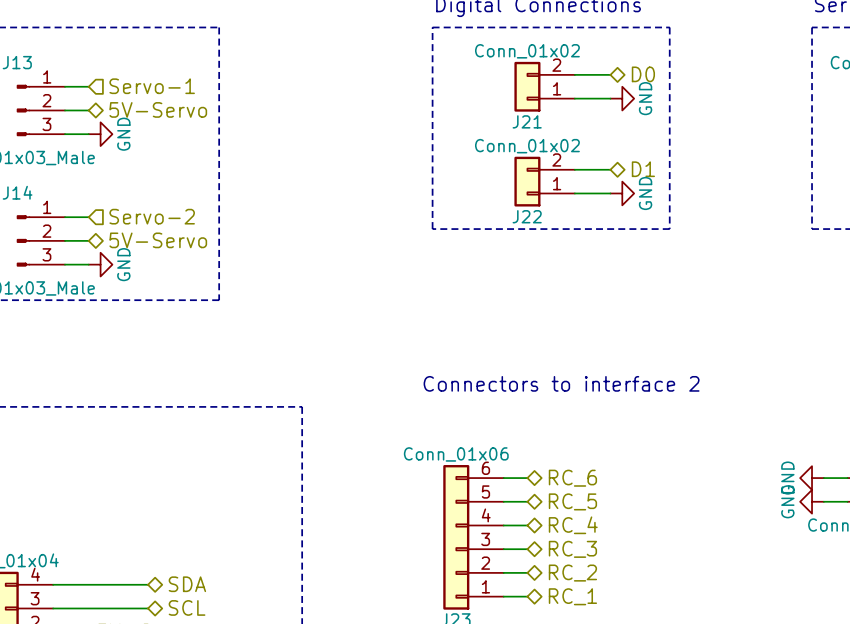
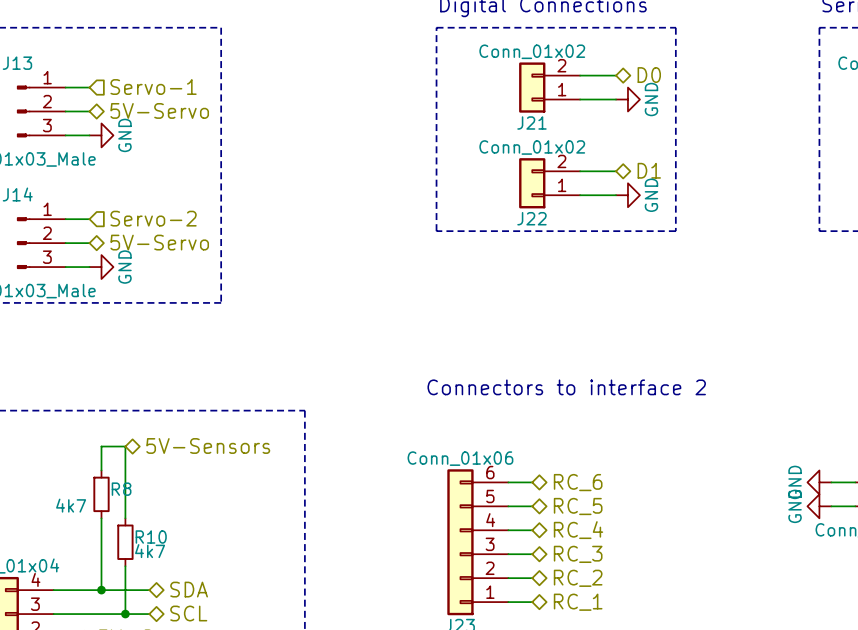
hierarchical label: none -> 5V-Sensors (208, 445)
wire: none -> (101, 470) (101, 446) (125, 446) (125, 518)
R8: none -> 4k7 (101, 494)
wire: none -> (101, 518) (101, 590)
R10: none -> 4k7 (125, 542)
wire: none -> (125, 566) (125, 614)
junction: none -> (101, 590)
junction: none -> (125, 614)

